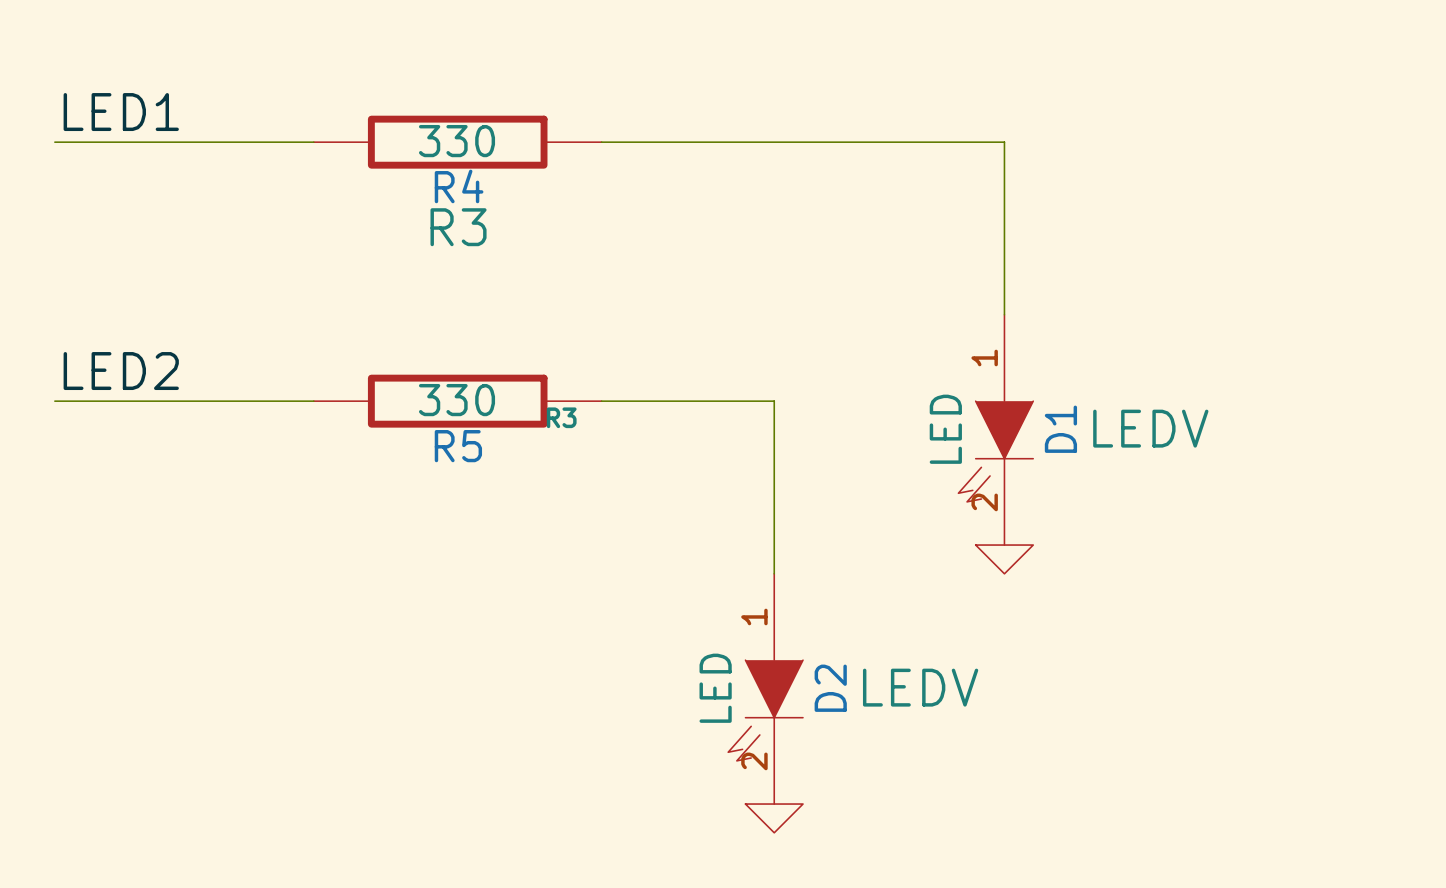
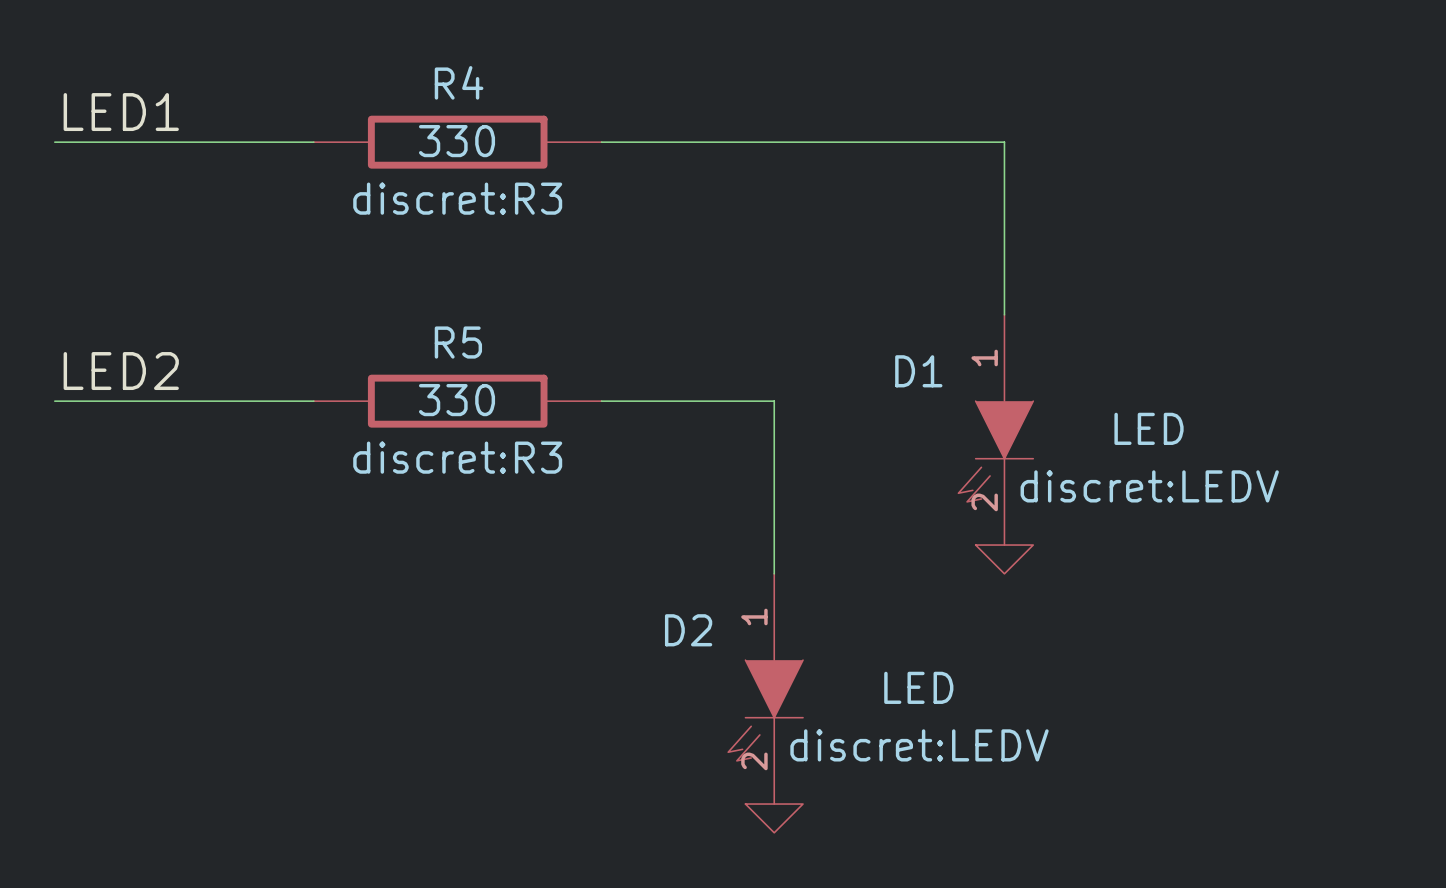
R4 name position: R4 (459, 186) -> R4 (459, 82)
R4 text: R3 (458, 227) -> discret:R3 (457, 198)
R5 text: R3 (561, 417) -> discret:R3 (457, 457)
D1 text: LEDV (1150, 428) -> discret:LEDV (1149, 486)
D1 value rotation: 0° (945, 429) -> 90° clockwise (1149, 428)
D1 value position: LED (945, 429) -> LED (1149, 428)
D1 name rotation: 0° (1060, 429) -> 90° clockwise (918, 371)
D1 name position: D1 (1060, 429) -> D1 (918, 371)
R5 name position: R5 (458, 446) -> R5 (458, 342)
D2 text: LEDV (920, 687) -> discret:LEDV (919, 745)
D2 value rotation: 0° (715, 688) -> 90° clockwise (918, 687)
D2 value position: LED (715, 688) -> LED (918, 687)
D2 name rotation: 0° (830, 688) -> 90° clockwise (688, 630)
D2 name position: D2 (830, 688) -> D2 (688, 630)

